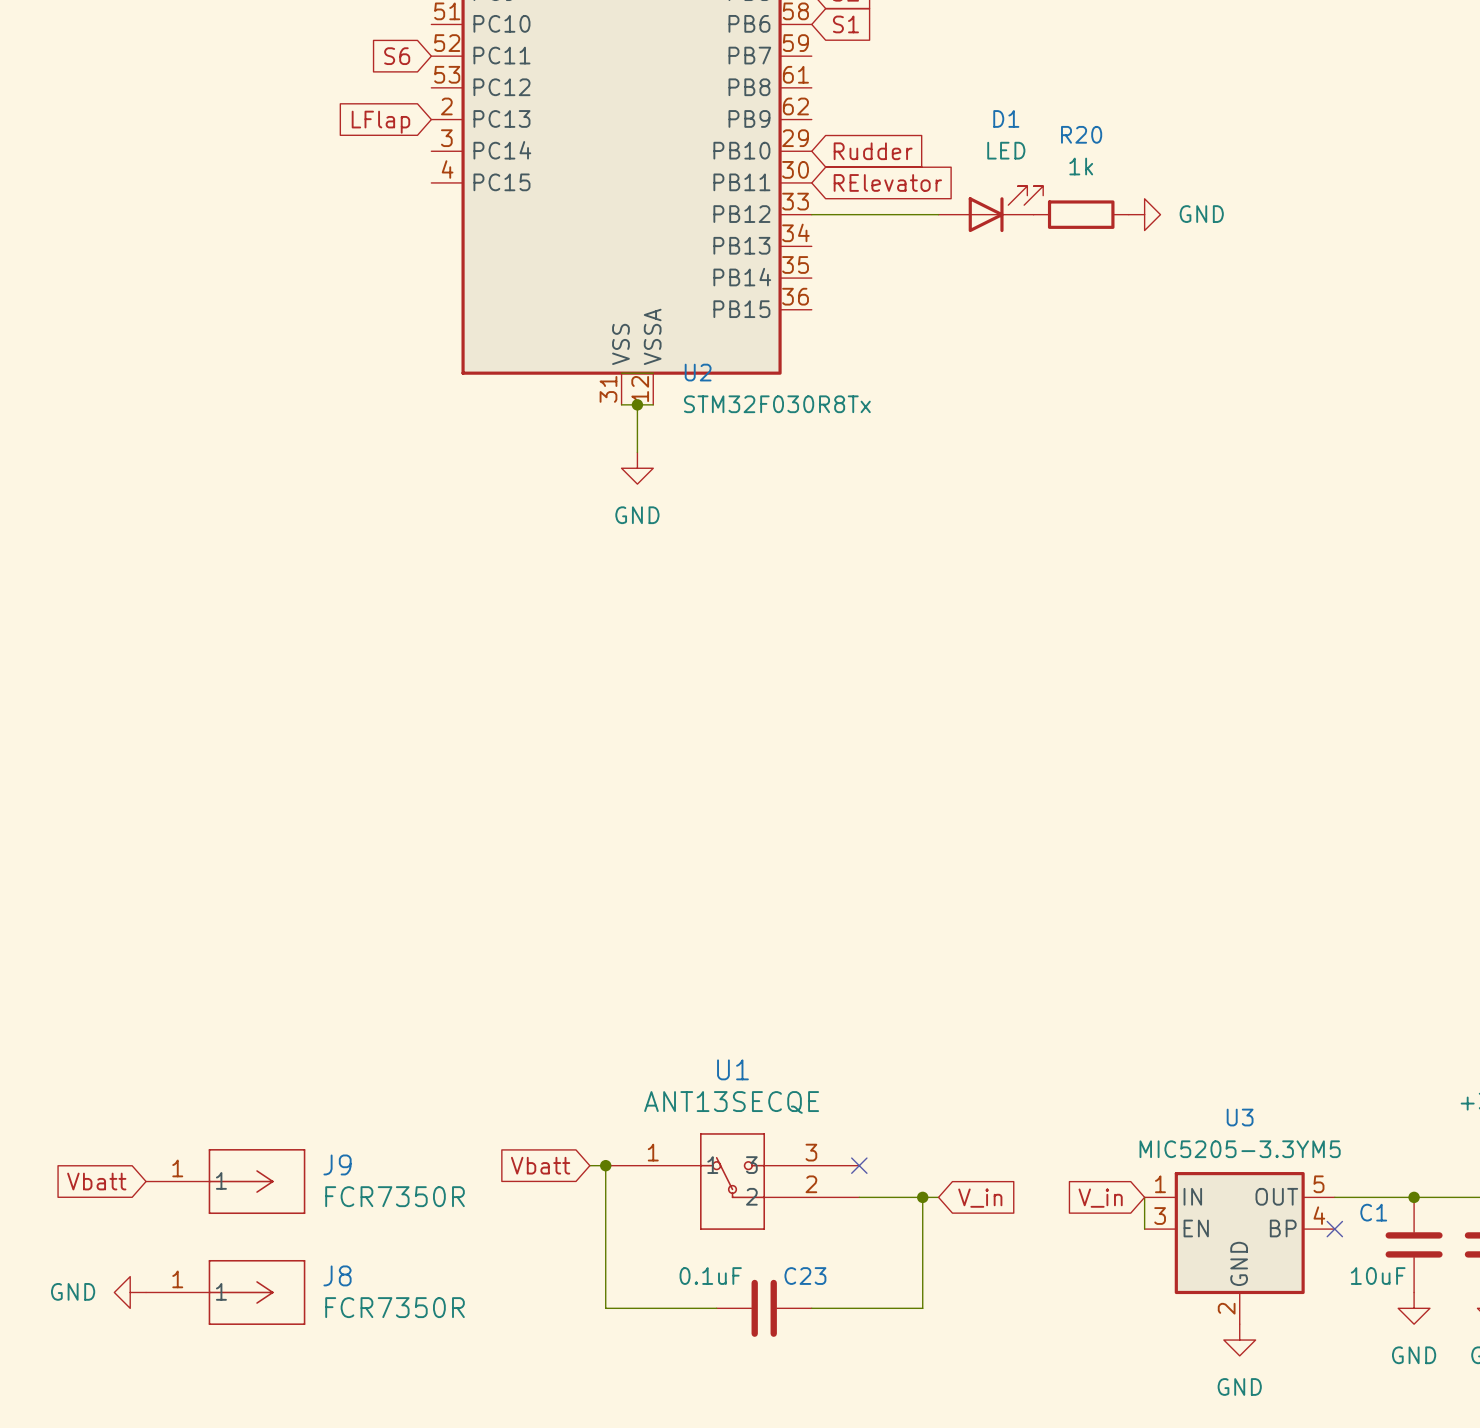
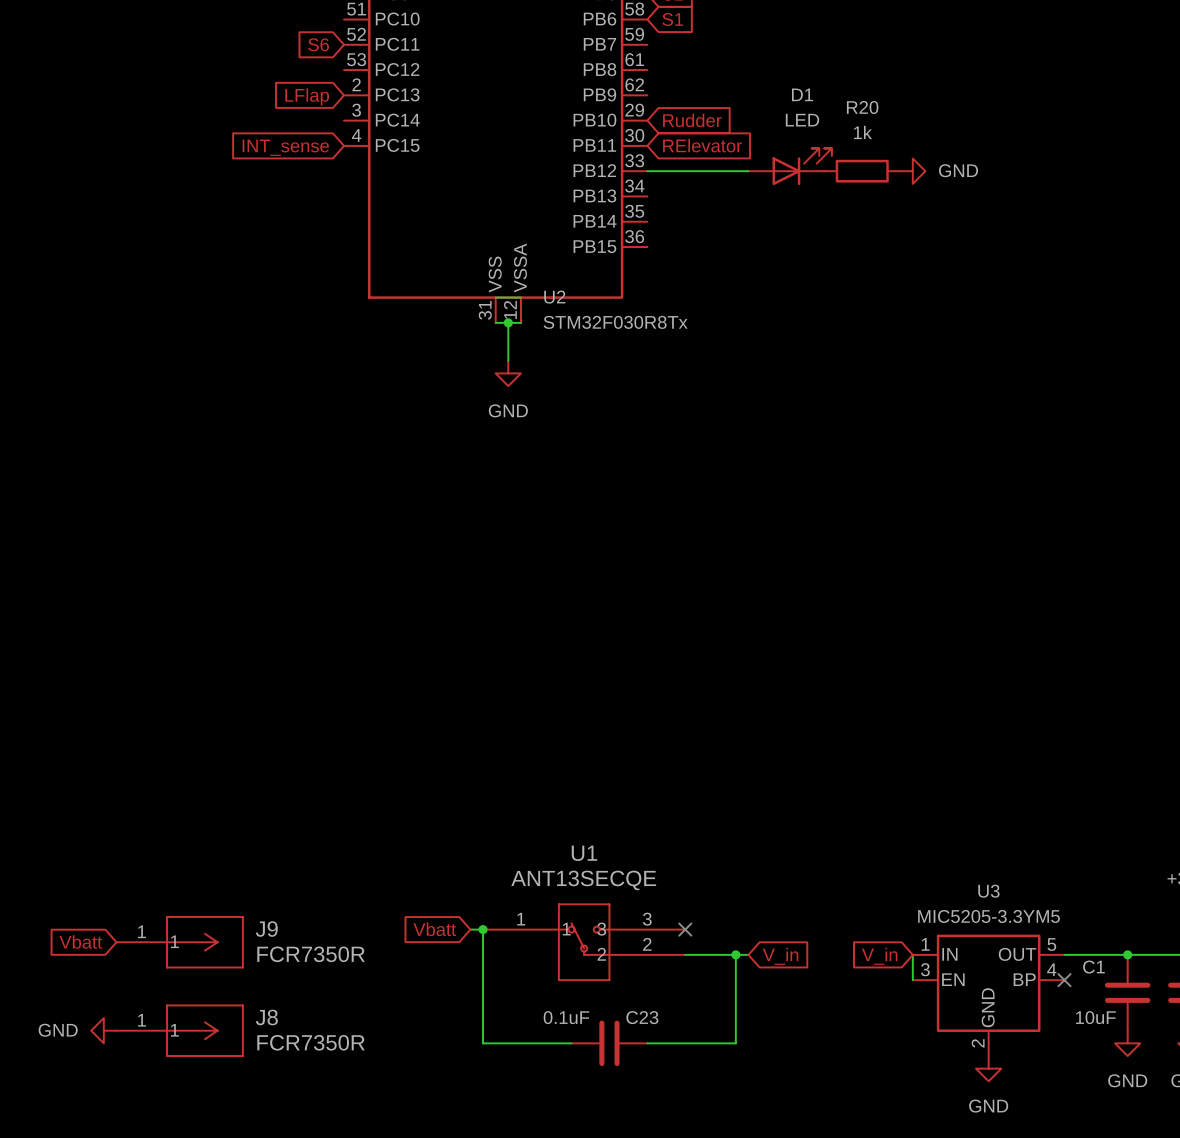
global label: none -> INT_sense (285, 147)

